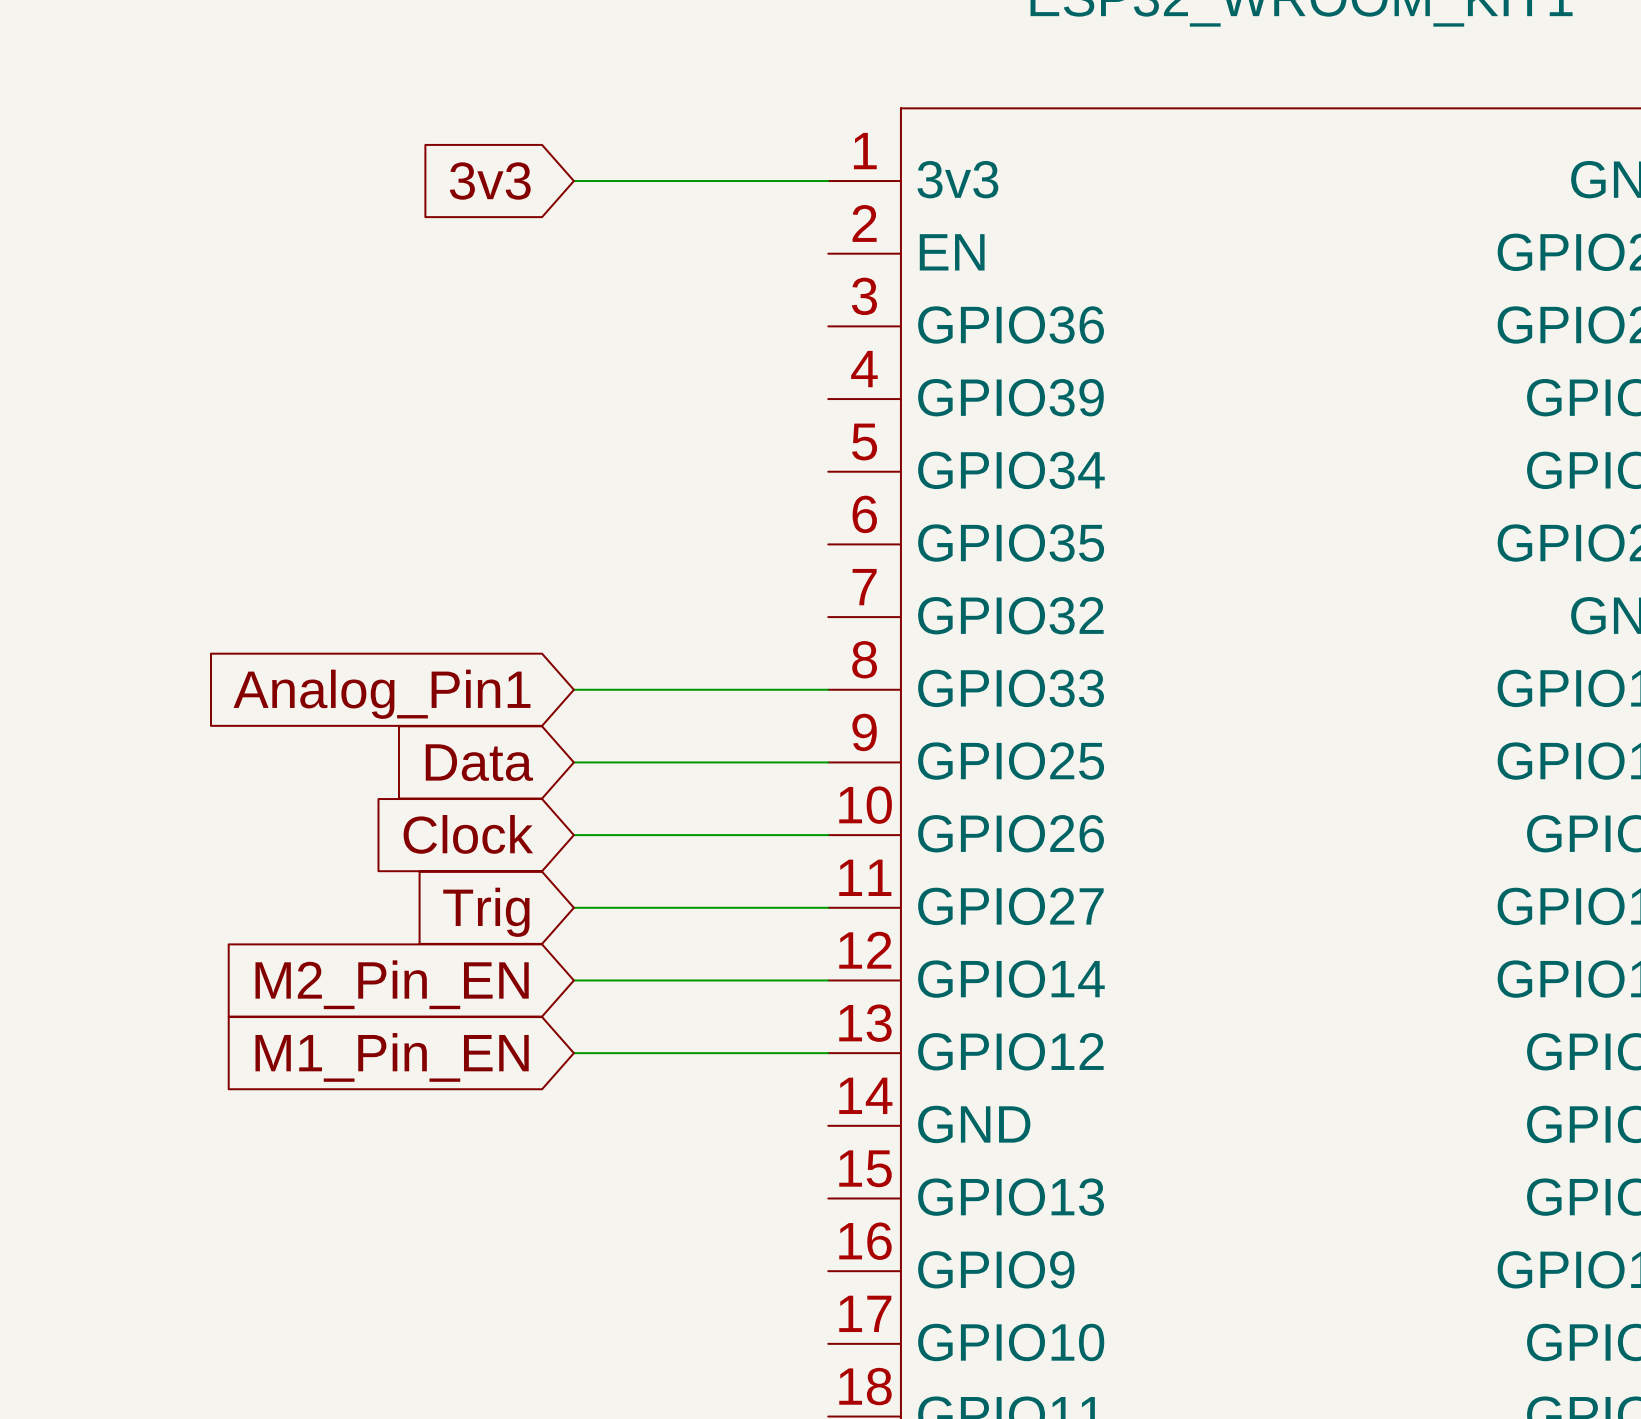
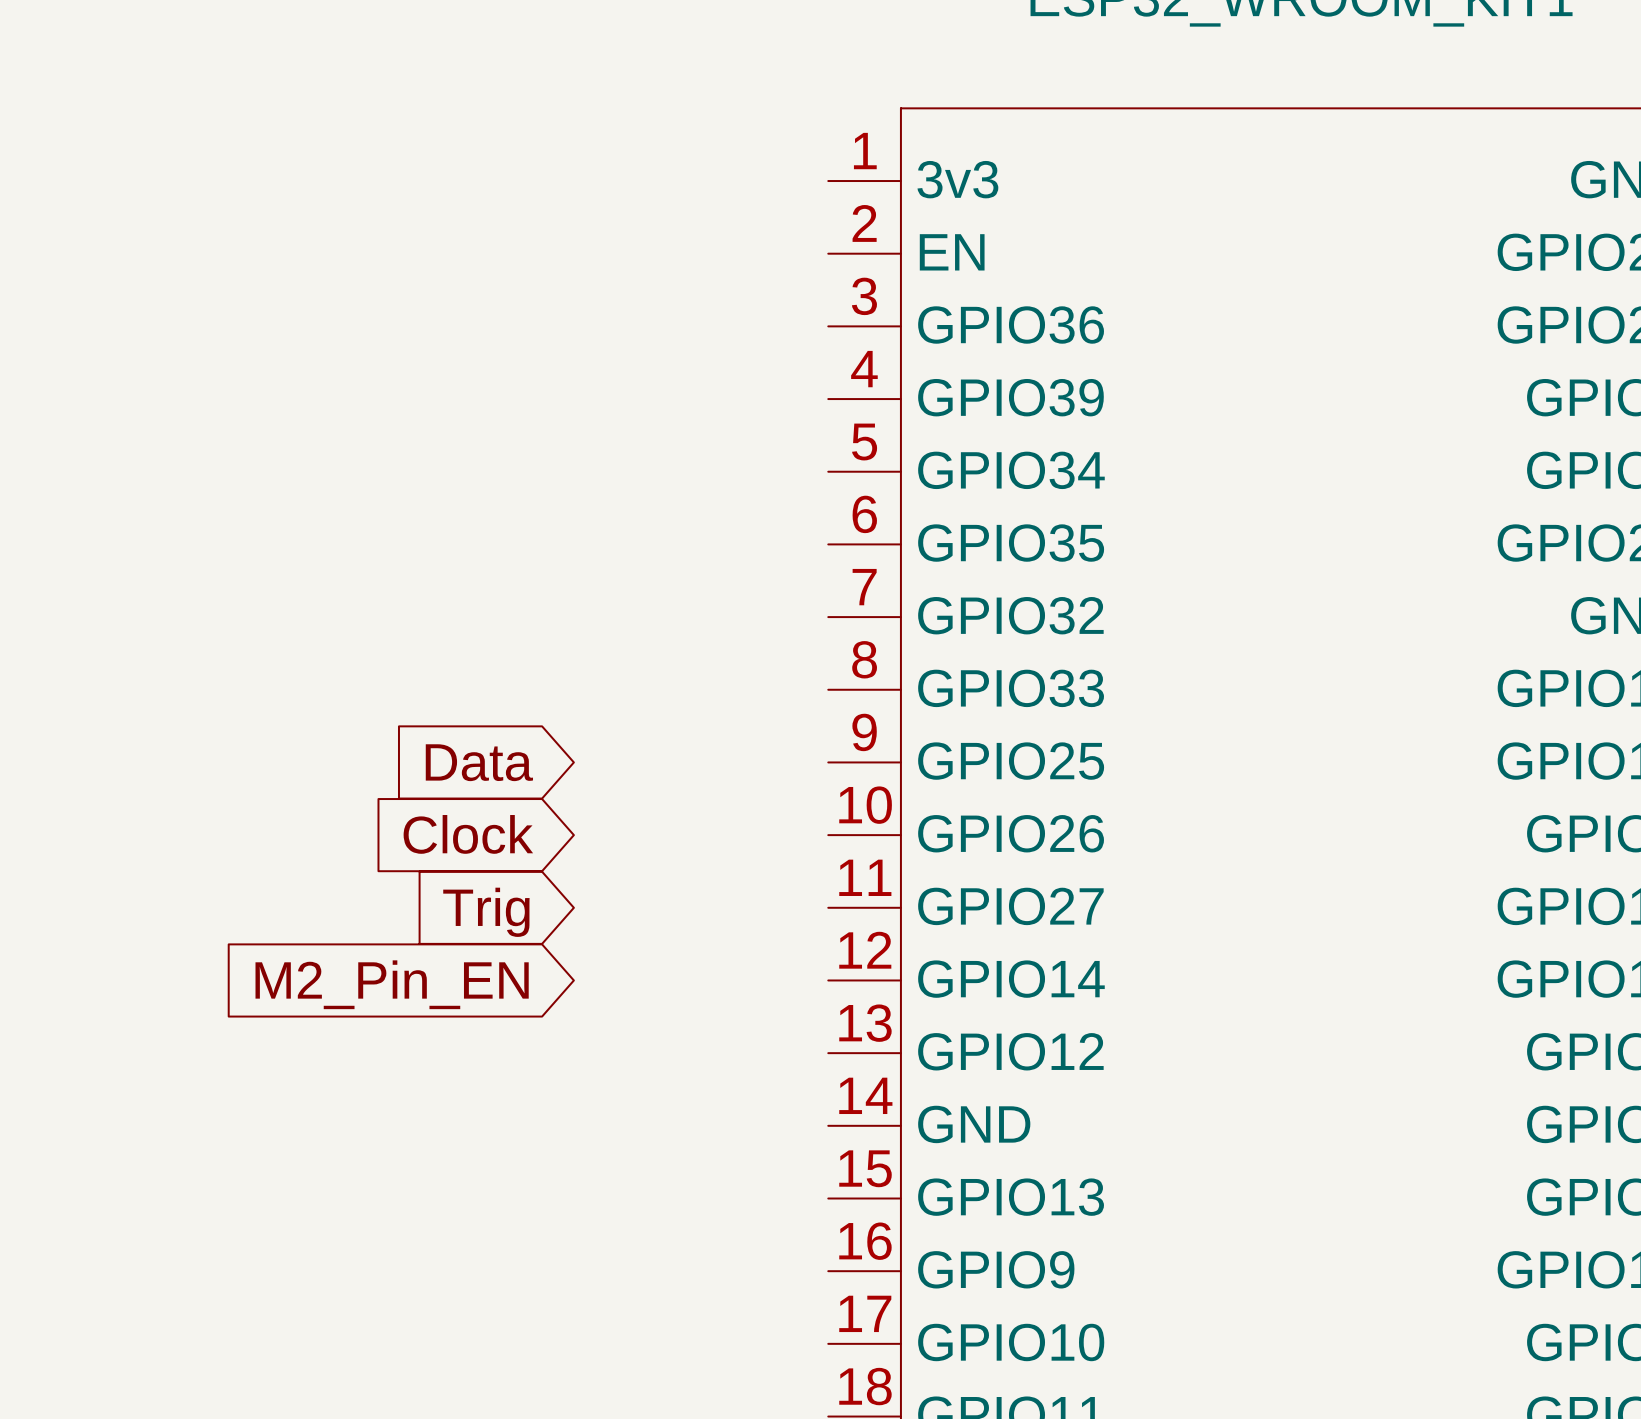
global label: 3v3 (490, 181) -> none
wire: (573, 181) (828, 181) -> none
wire: (573, 689) (828, 689) -> none
global label: Analog_Pin1 (381, 694) -> none
wire: (573, 762) (828, 762) -> none
wire: (573, 835) (828, 835) -> none
wire: (573, 907) (828, 907) -> none
wire: (573, 980) (828, 980) -> none
wire: (573, 1053) (828, 1053) -> none
global label: M1_Pin_EN (392, 1057) -> none

